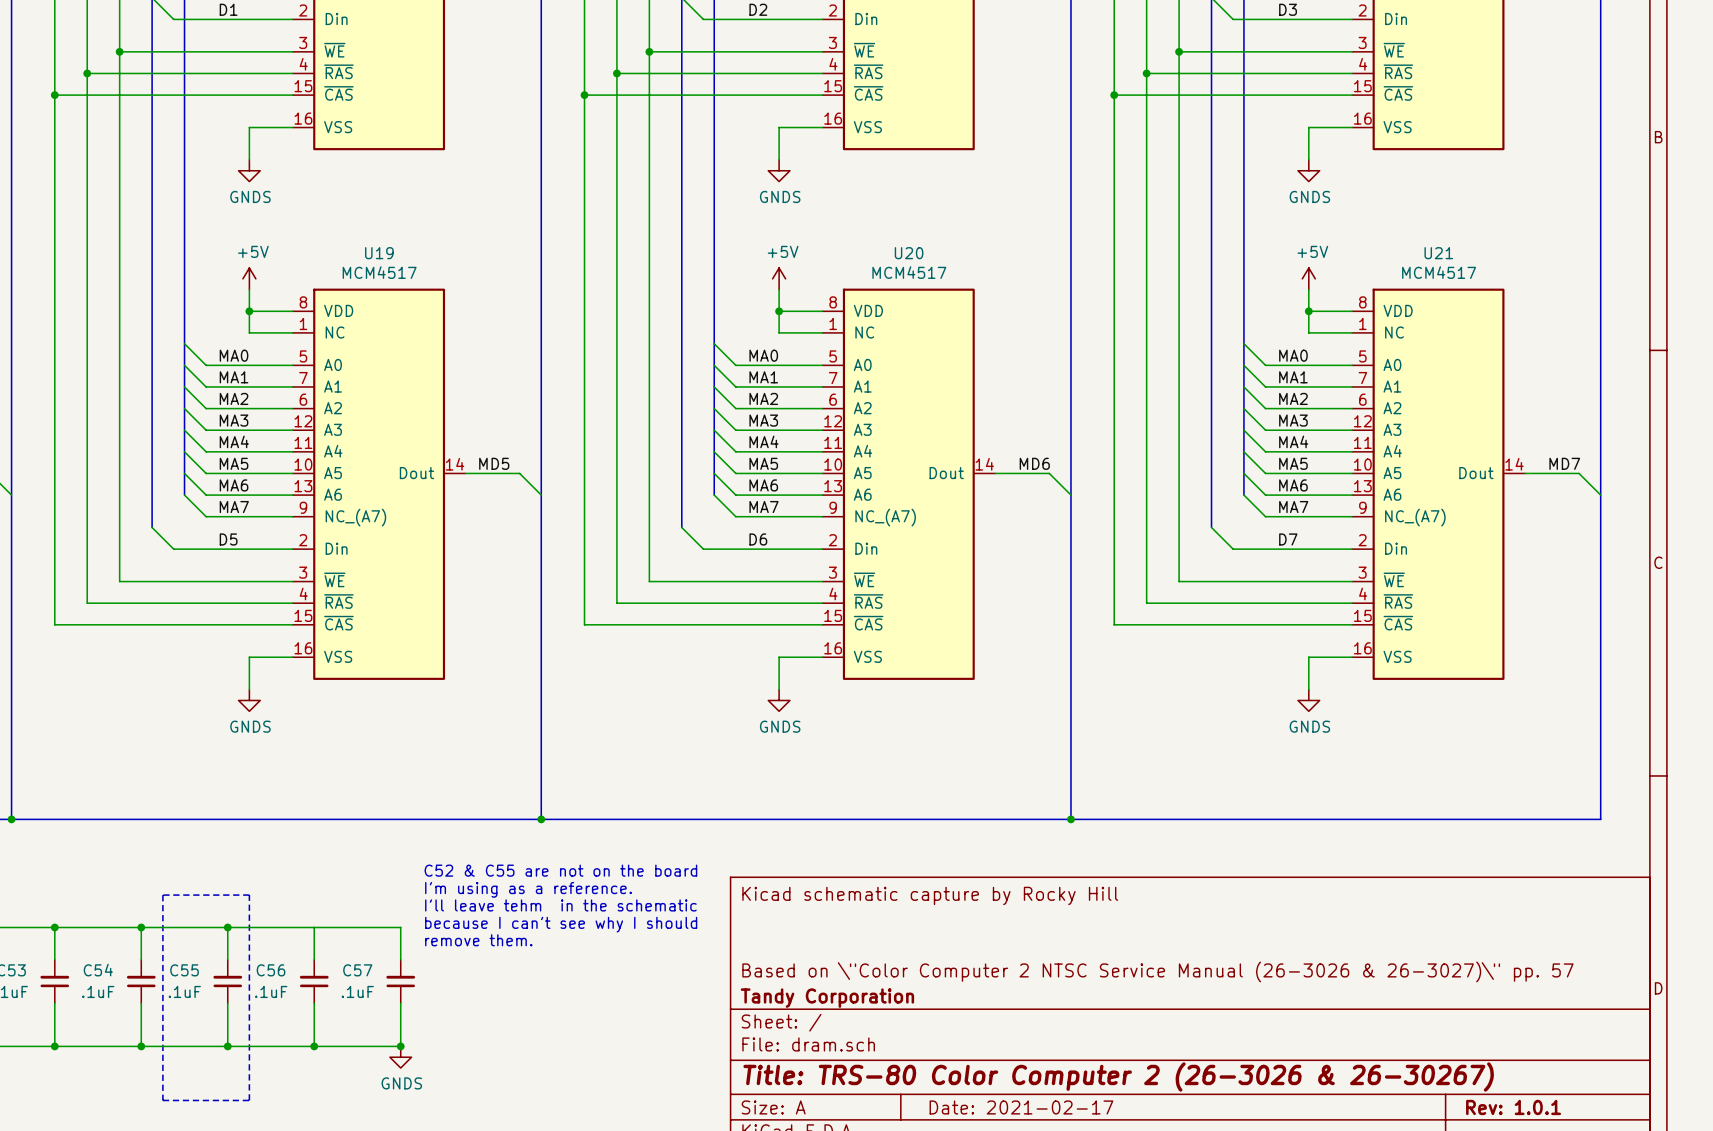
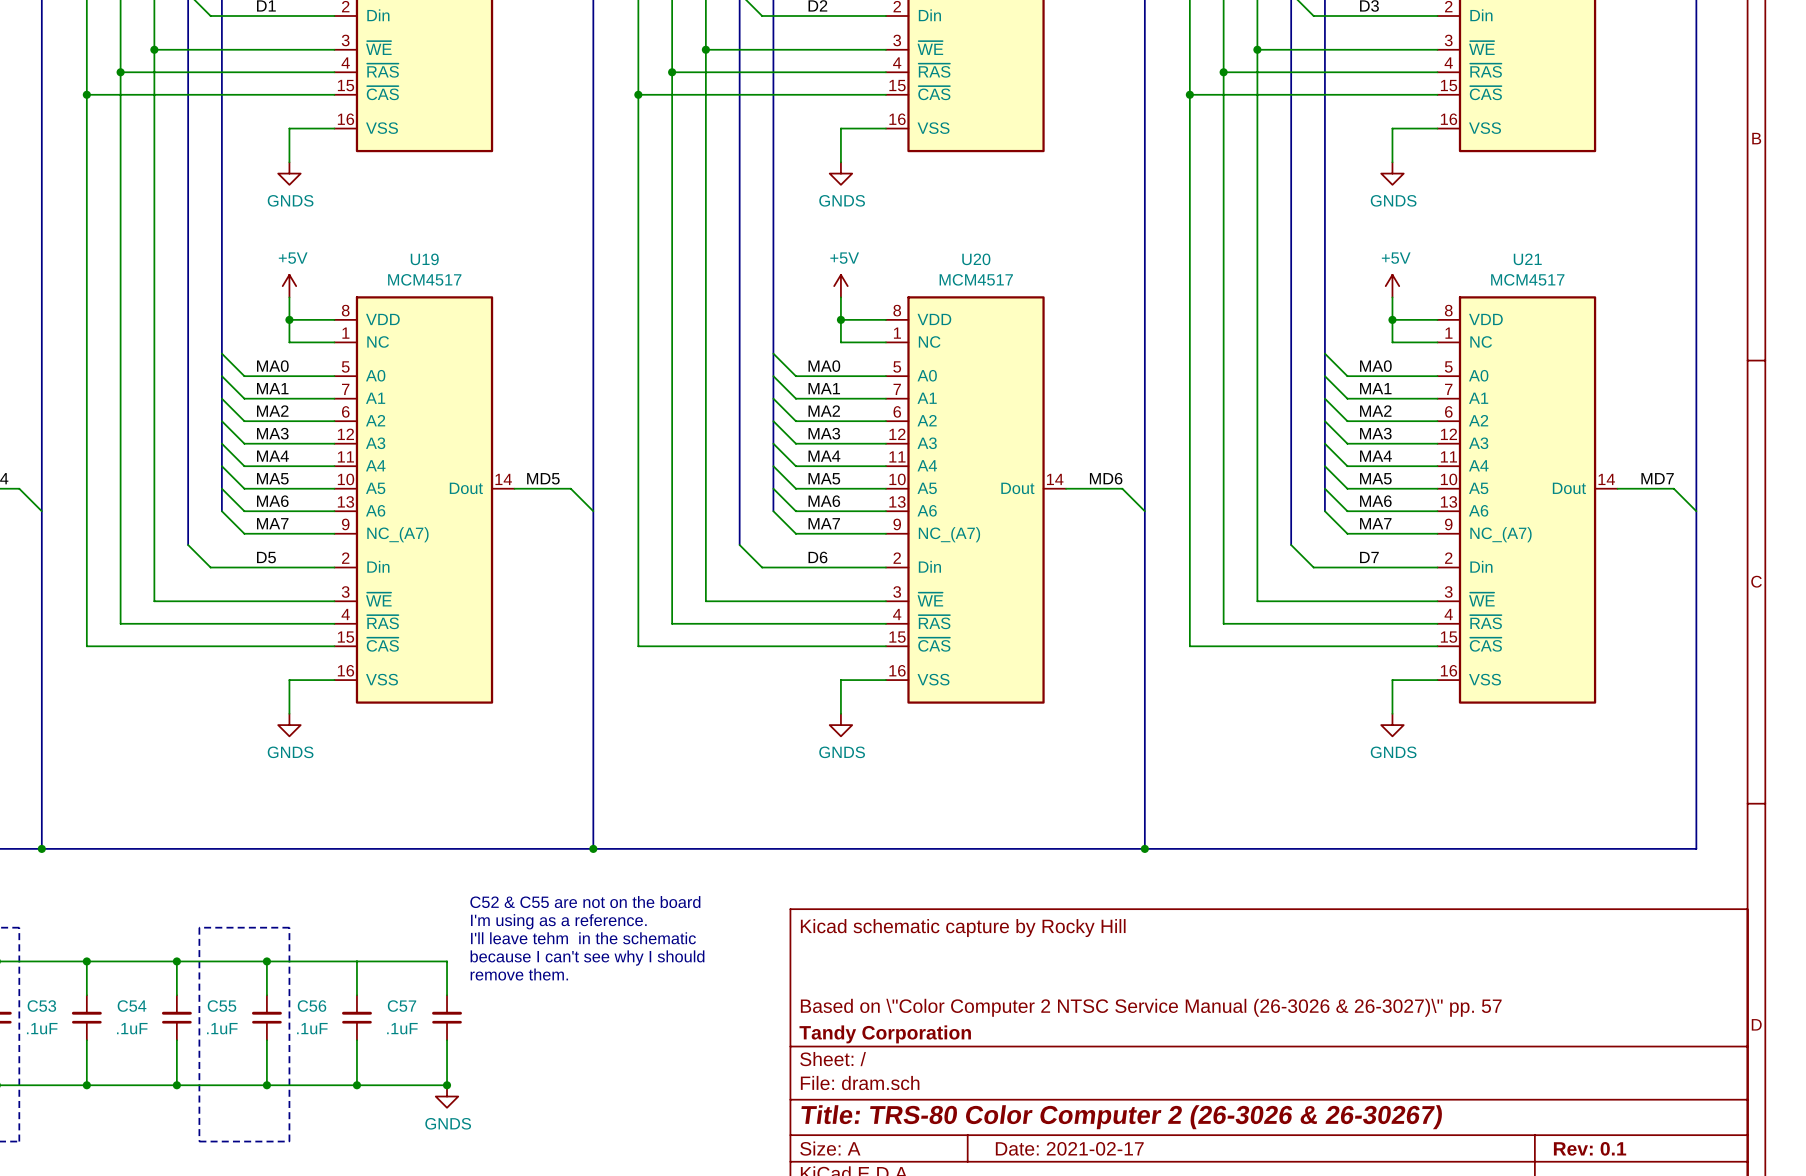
title block: Rev: 1.0.1 (1513, 1107) -> Rev: 0.1 (1590, 1148)

